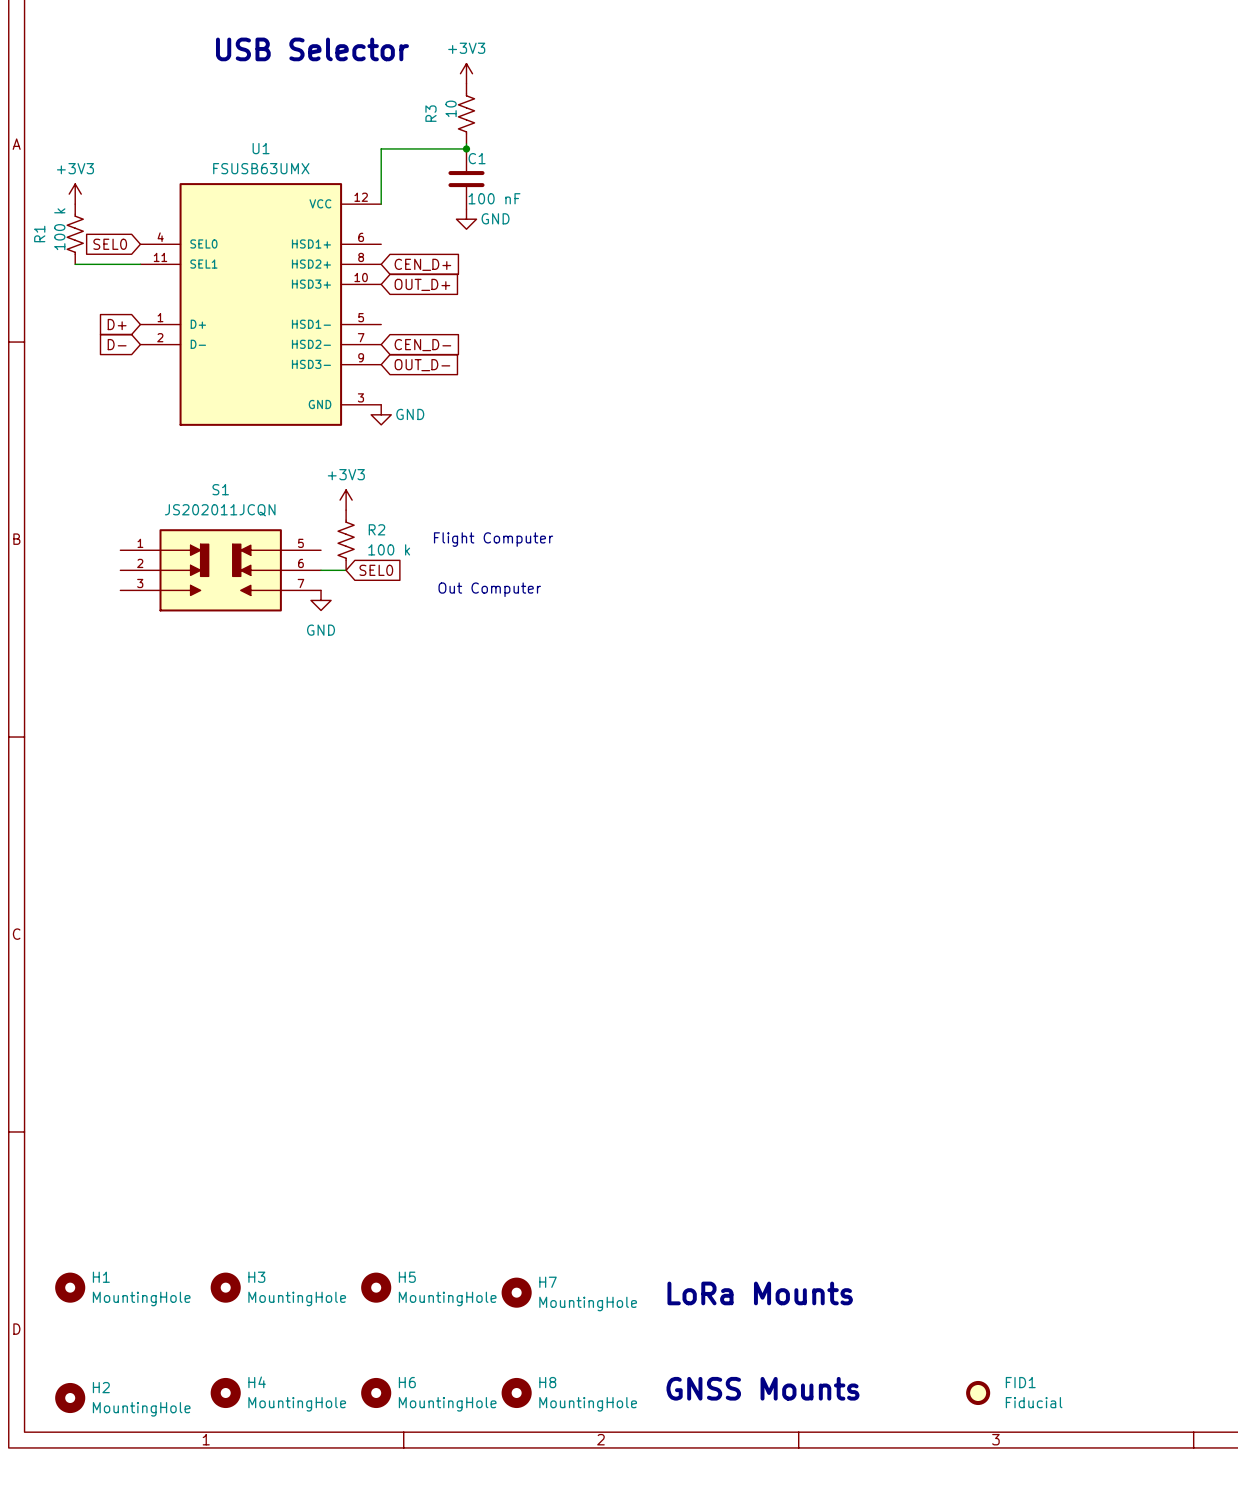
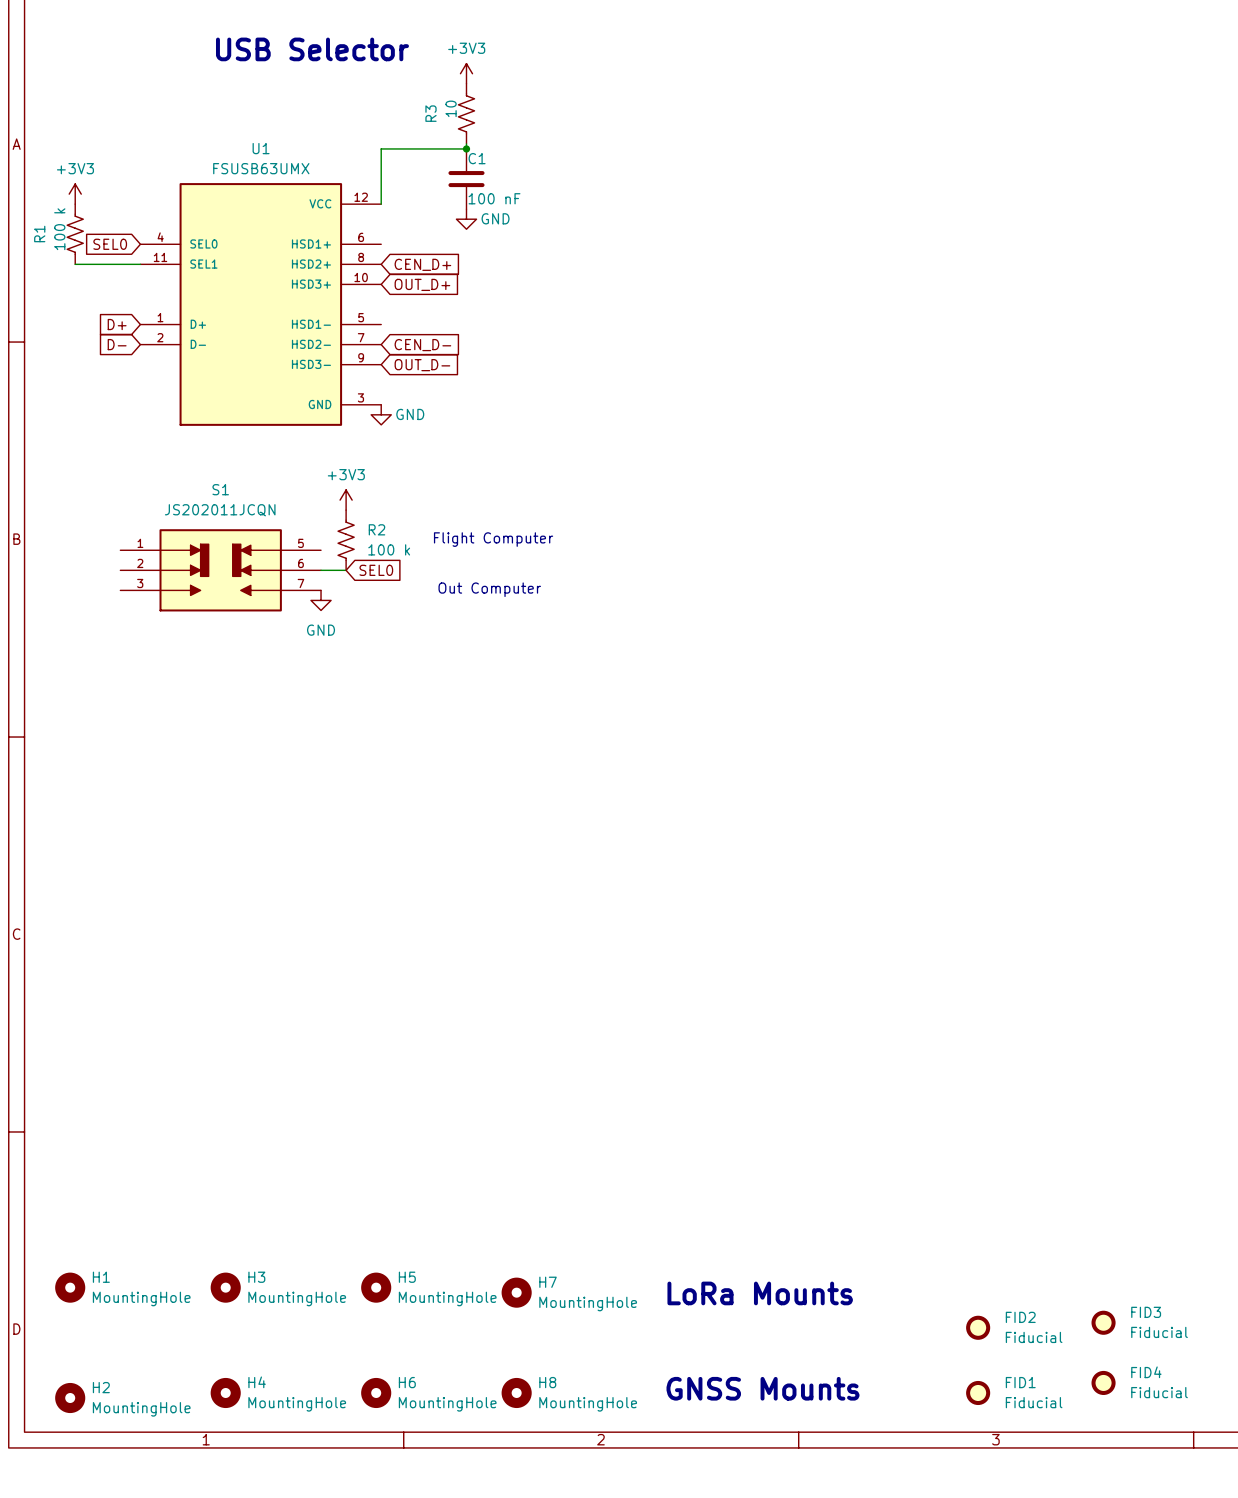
FID3: none -> Fiducial (1103, 1322)
FID2: none -> Fiducial (978, 1327)
FID4: none -> Fiducial (1103, 1382)

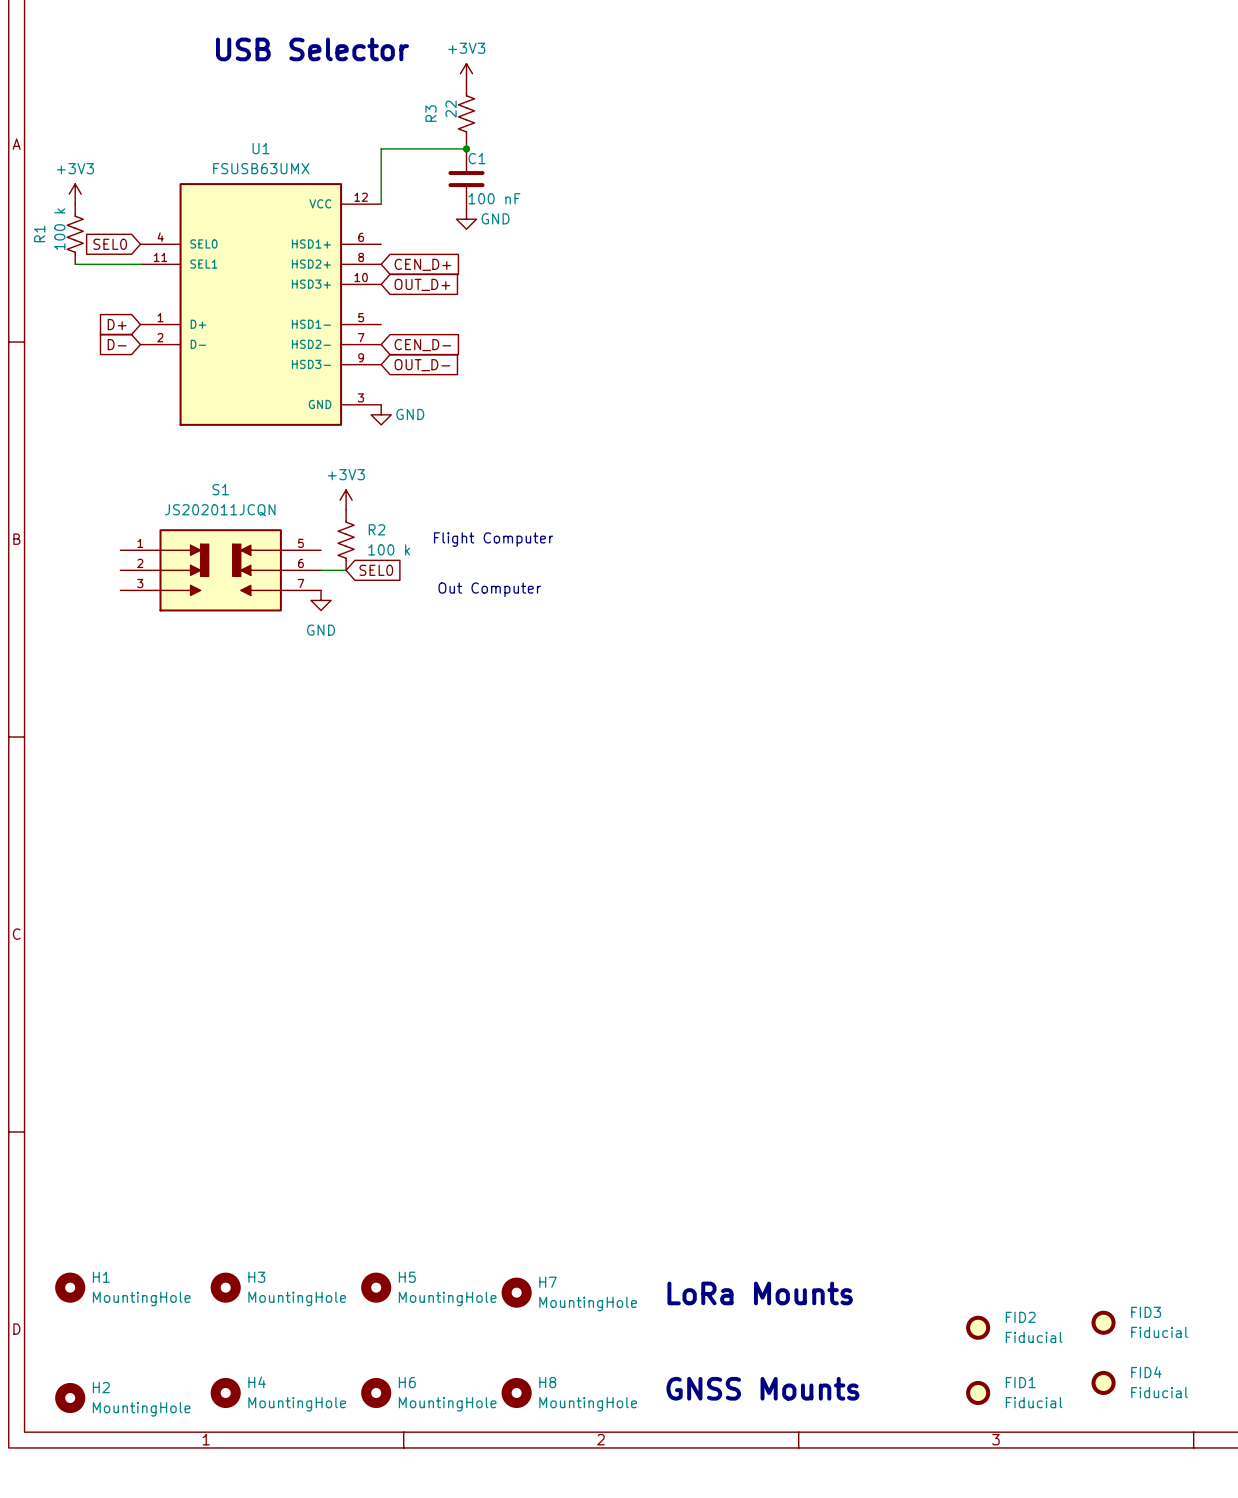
R3 value: 10 (451, 108) -> 22 (451, 109)

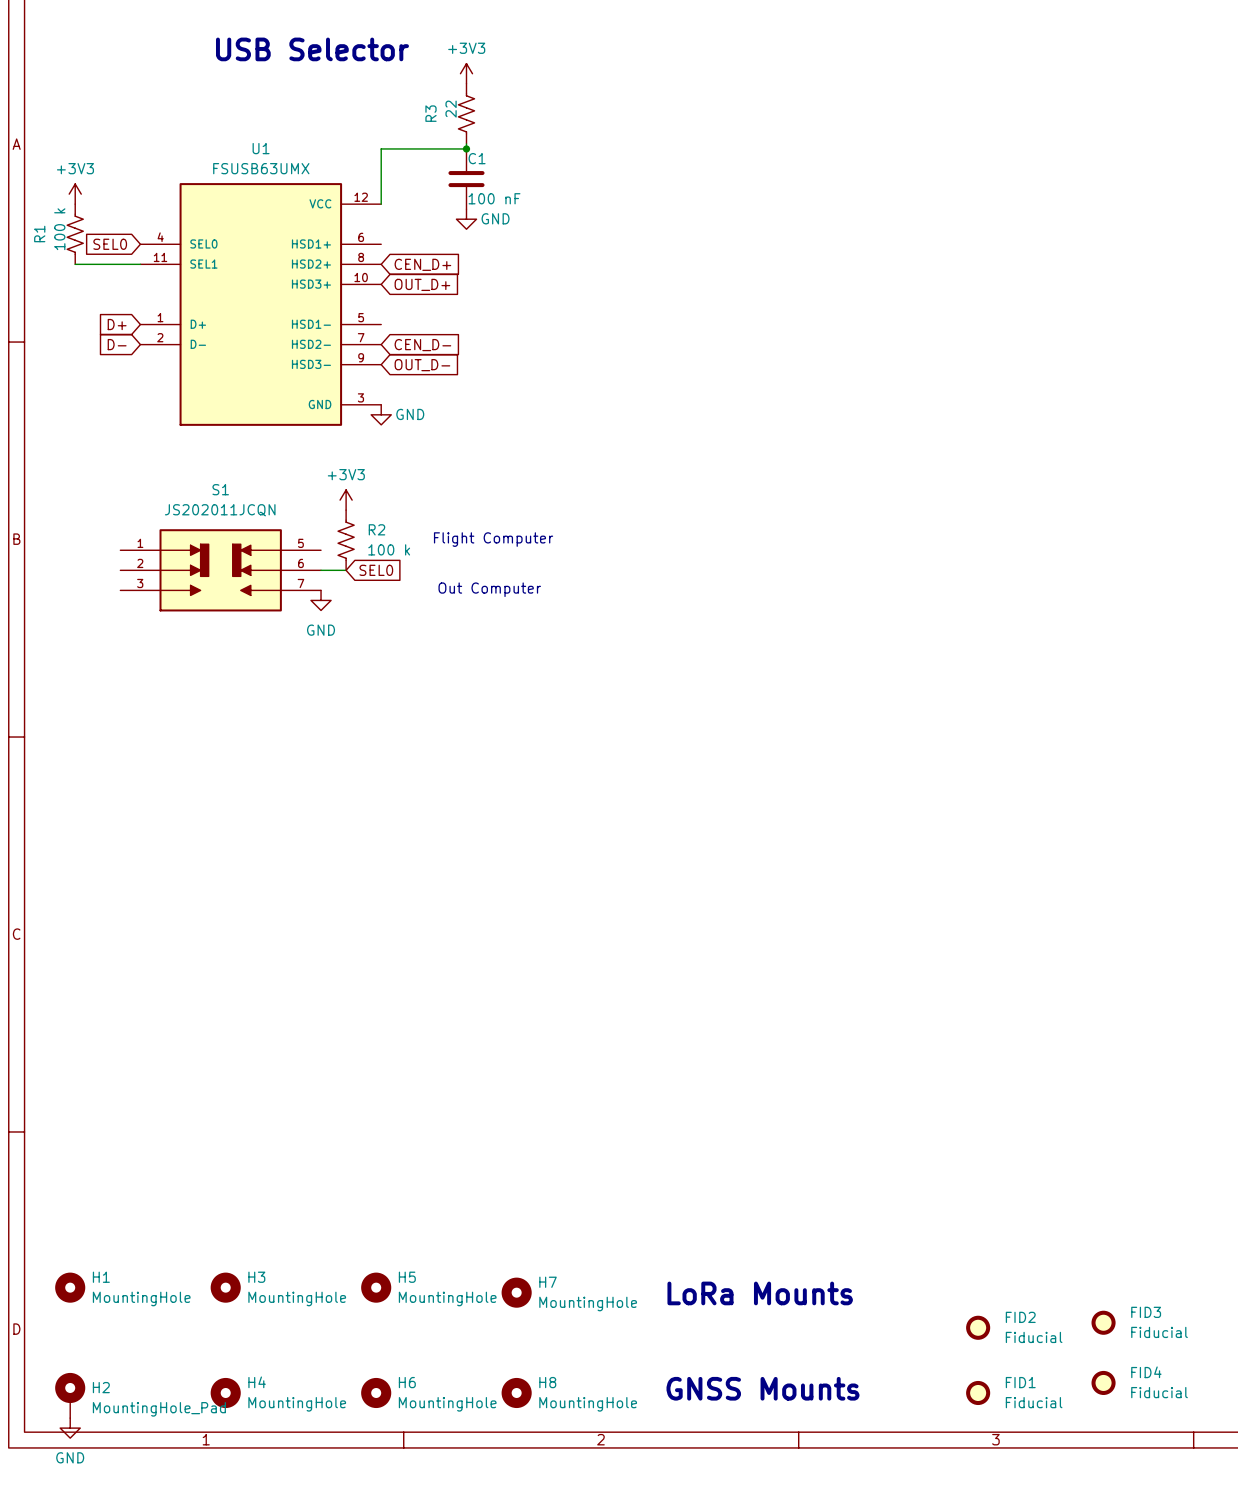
H2 symbol: [55, 1382, 86, 1414] -> [55, 1372, 86, 1419]
H2 value: MountingHole (141, 1409) -> MountingHole_Pad (159, 1409)
power symbol: none -> GND (70, 1428)

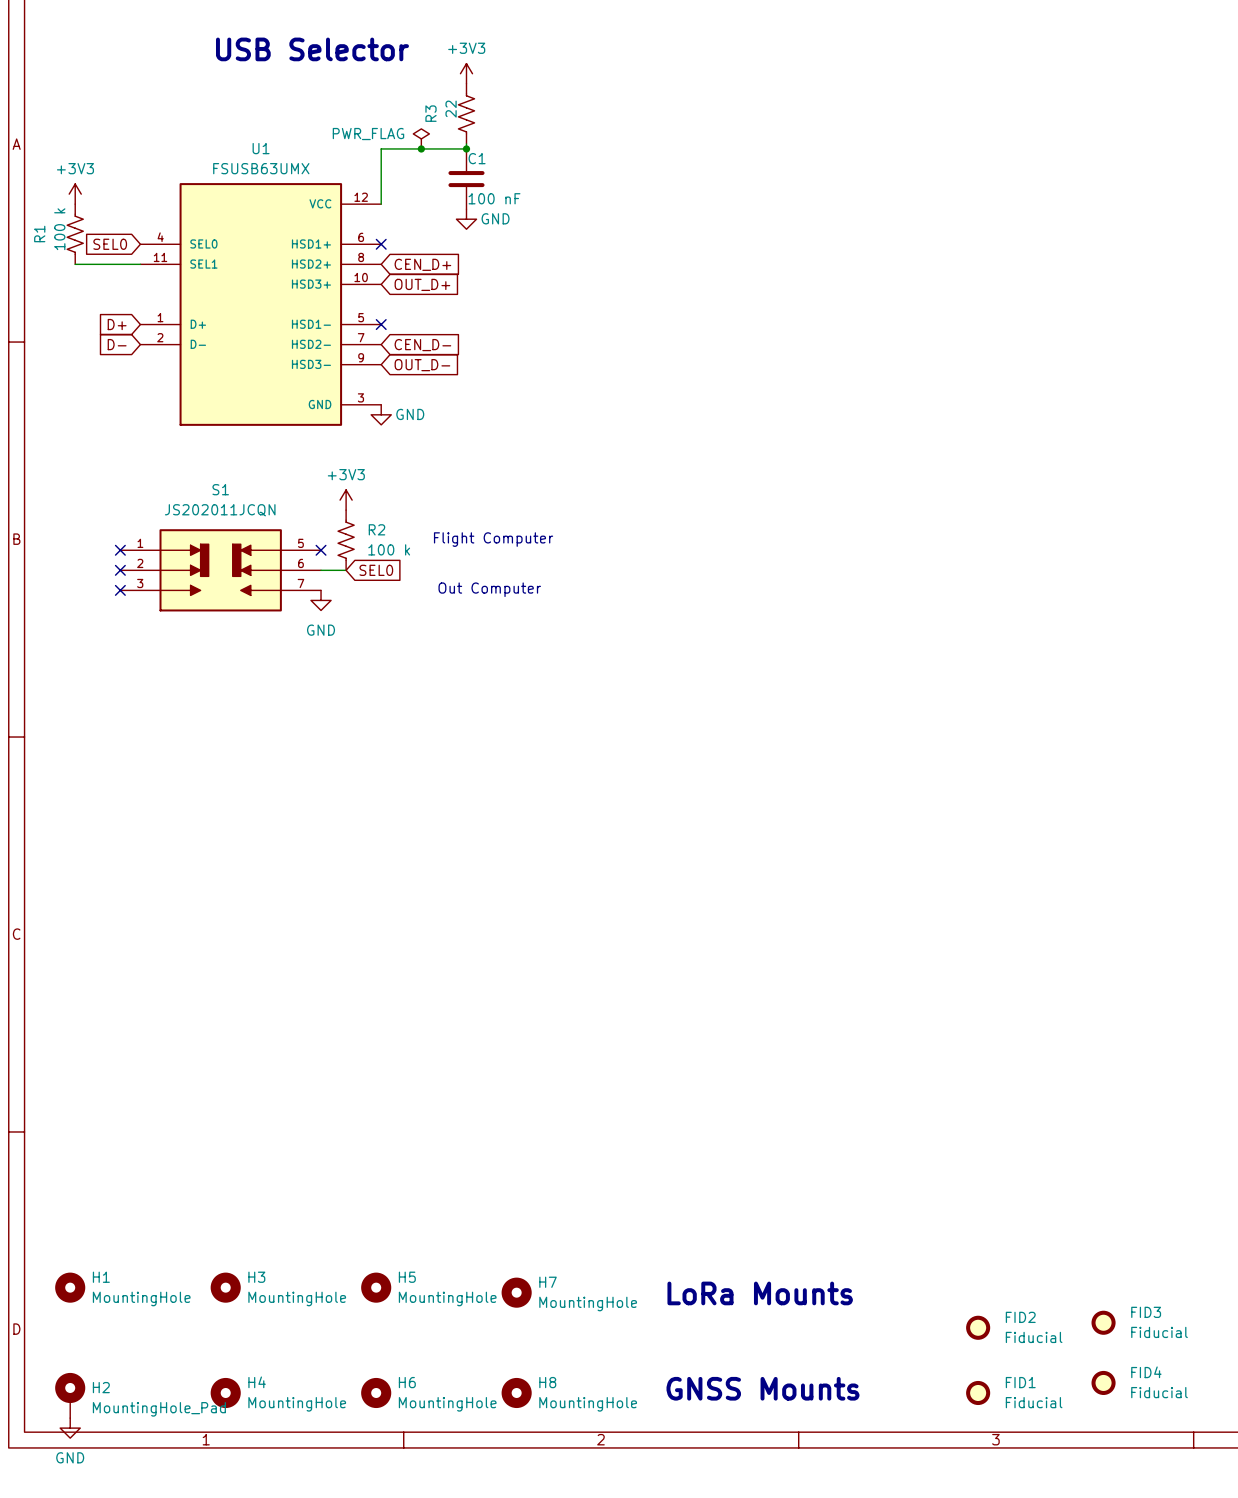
power symbol: none -> PWR_FLAG (421, 138)
junction: none -> (421, 148)
no-connect mark: none -> (381, 244)
no-connect mark: none -> (381, 324)
no-connect mark: none -> (120, 550)
no-connect mark: none -> (321, 550)
no-connect mark: none -> (120, 570)
no-connect mark: none -> (120, 590)

